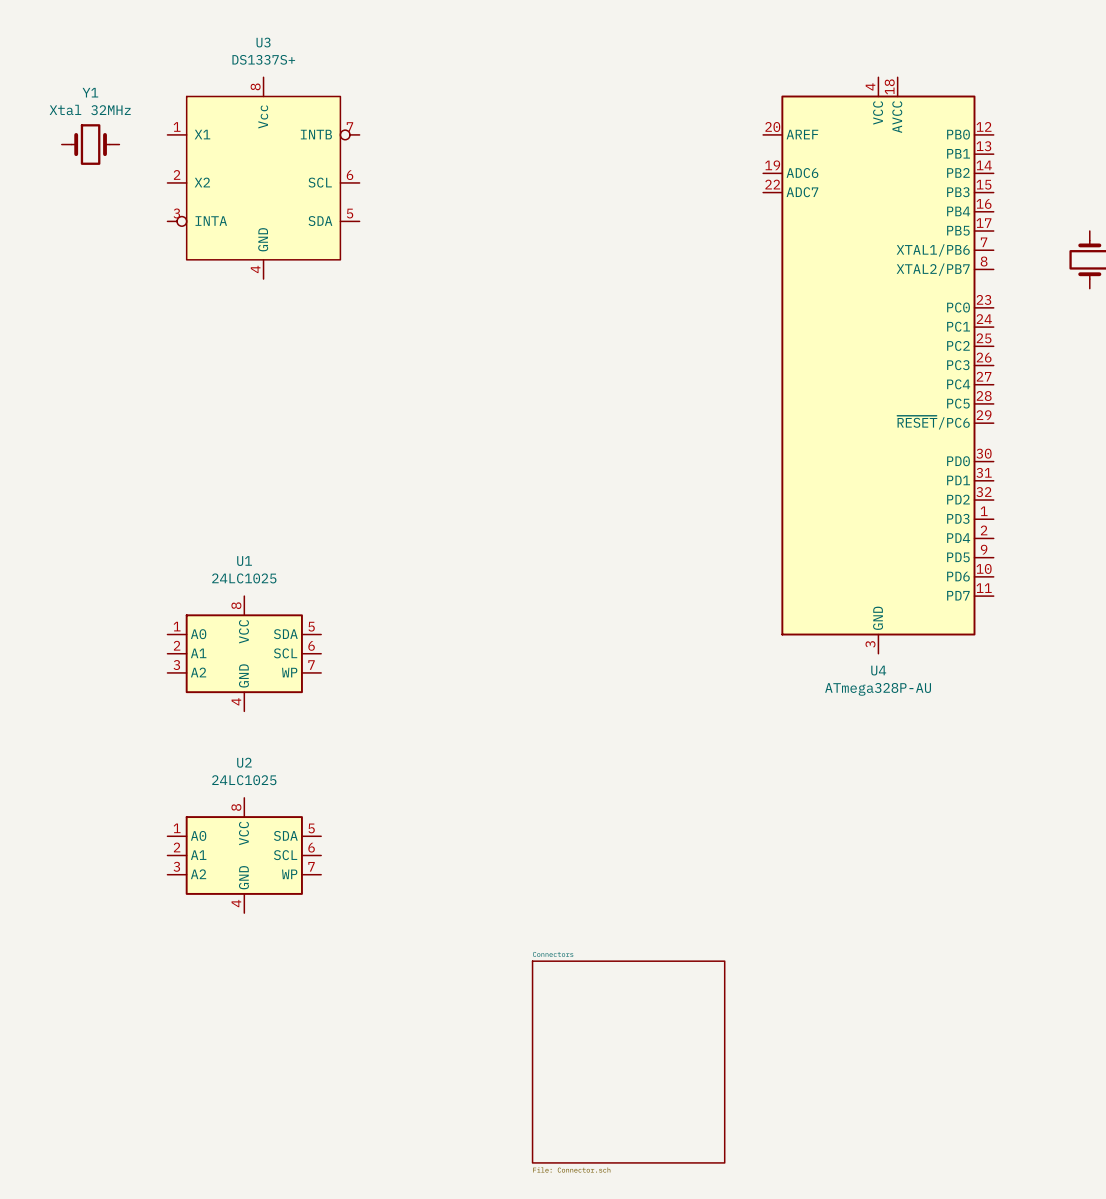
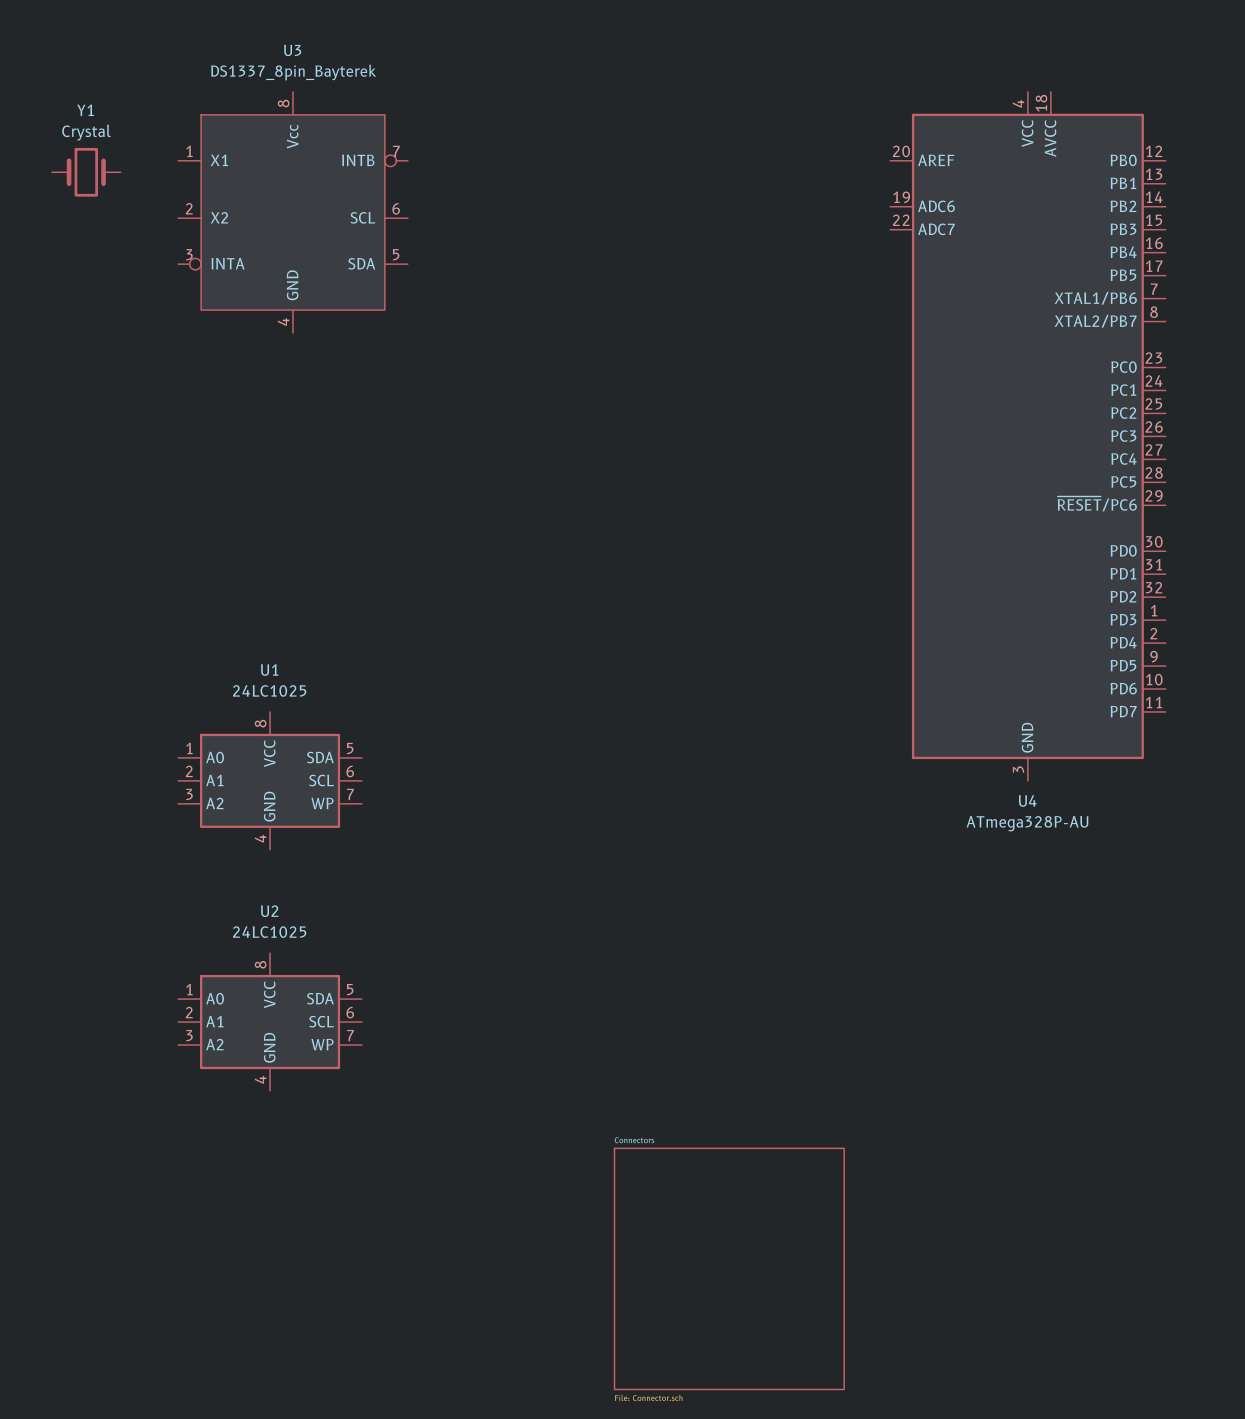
U3 value: DS1337S+ (263, 59) -> DS1337_8pin_Bayterek (293, 72)
Y1 value: Xtal 32MHz (90, 109) -> Crystal (86, 132)

